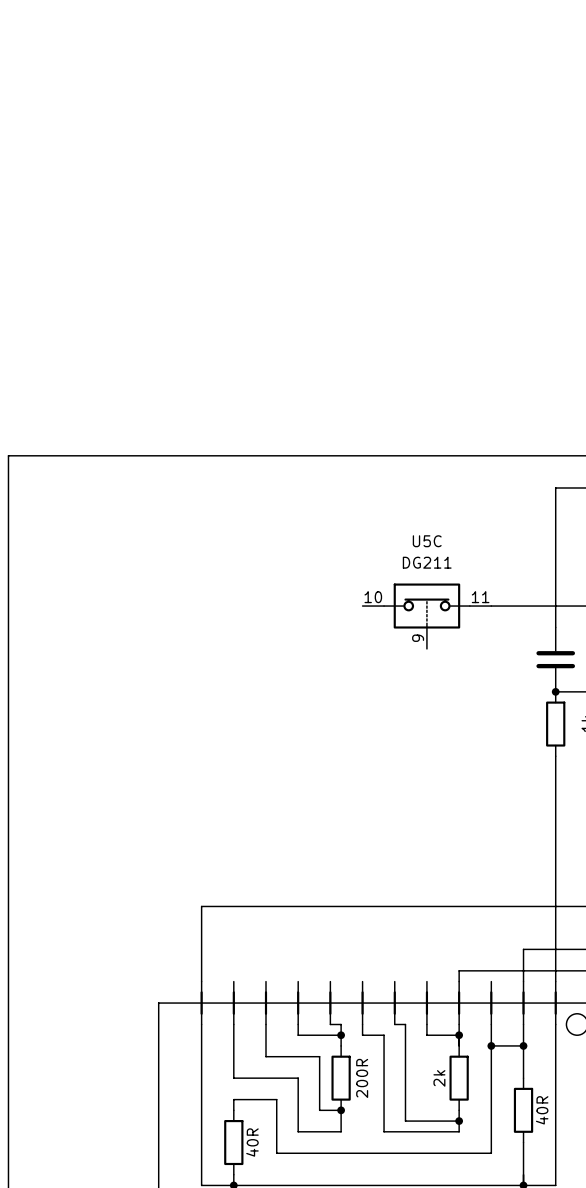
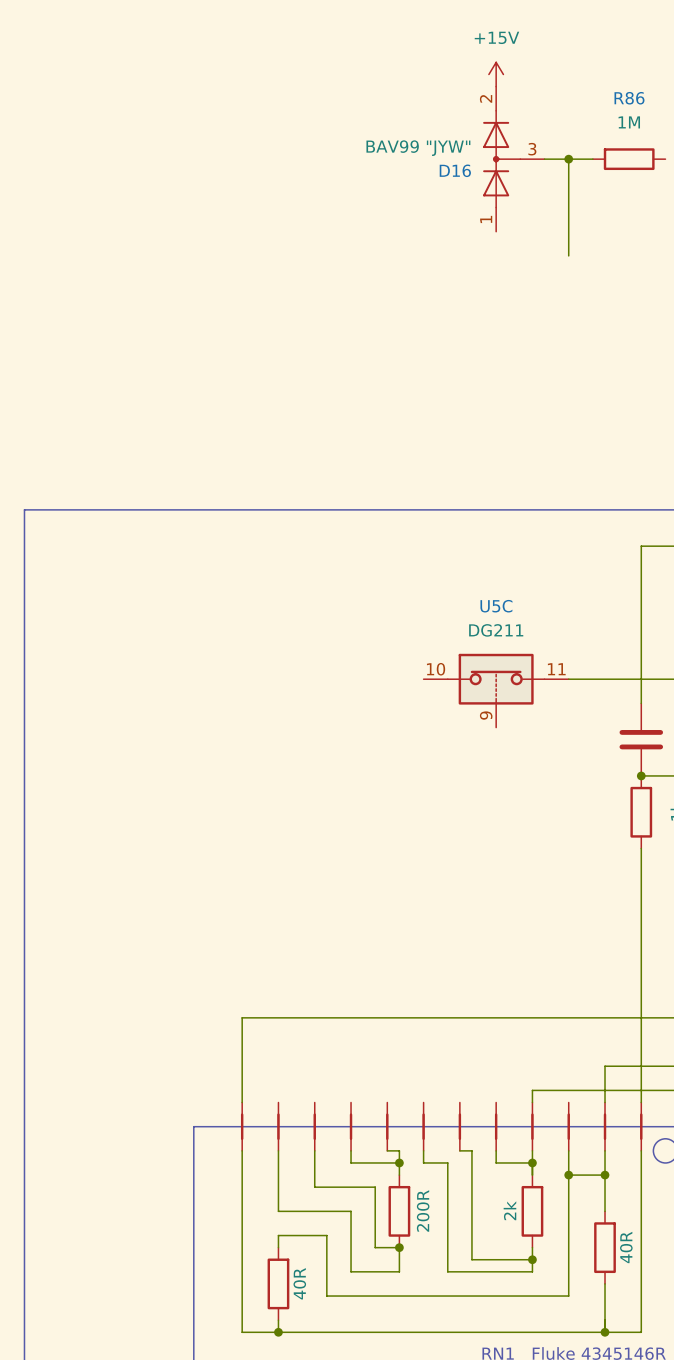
power symbol: none -> +15V (496, 74)
D16: none -> BAV99 "JYW" (513, 159)
wire: none -> (544, 159) (592, 159)
wire: none -> (568, 159) (568, 255)
junction: none -> (568, 159)
R86: none -> 1M (629, 159)

